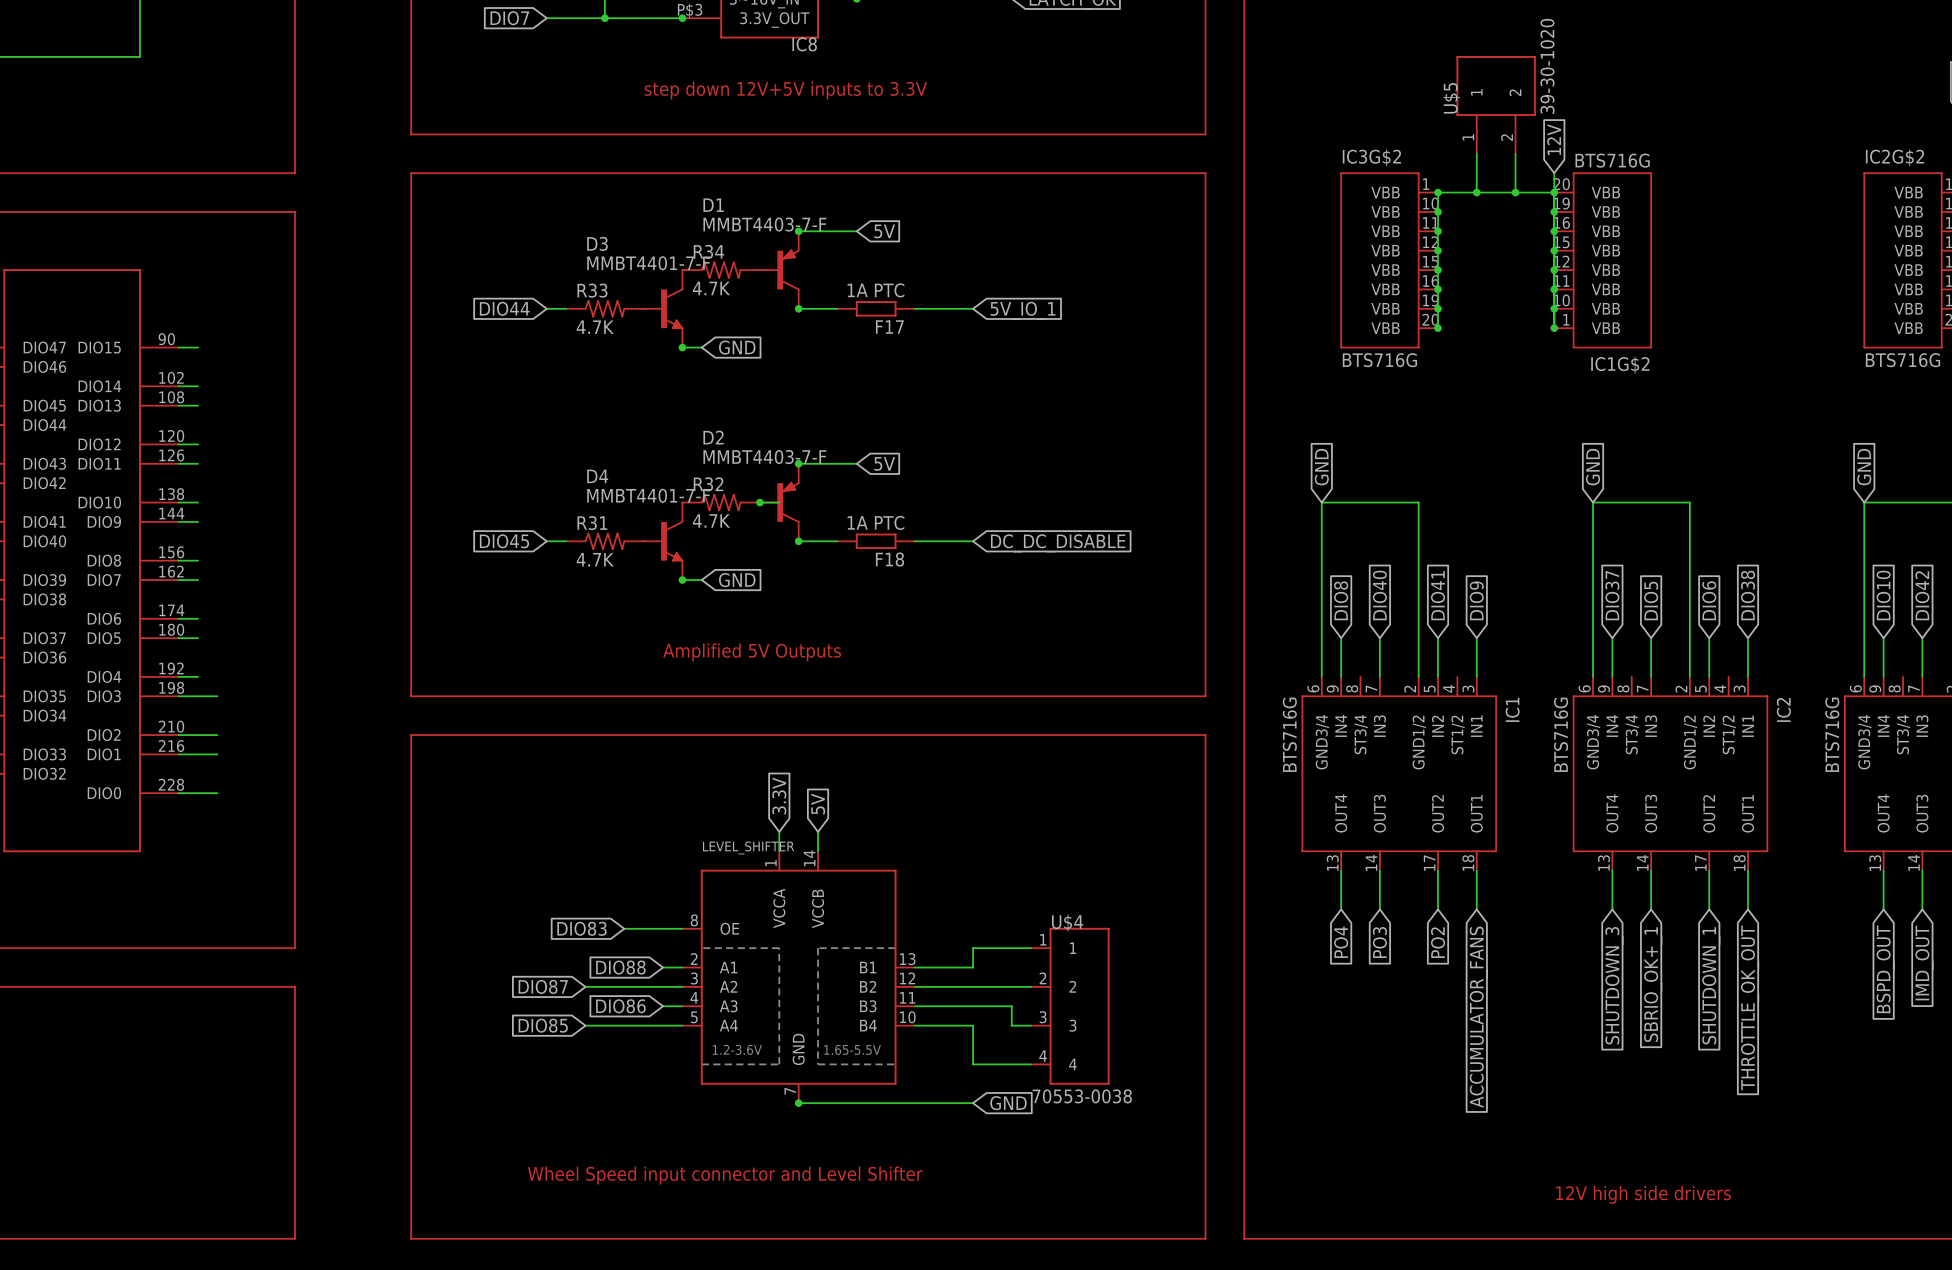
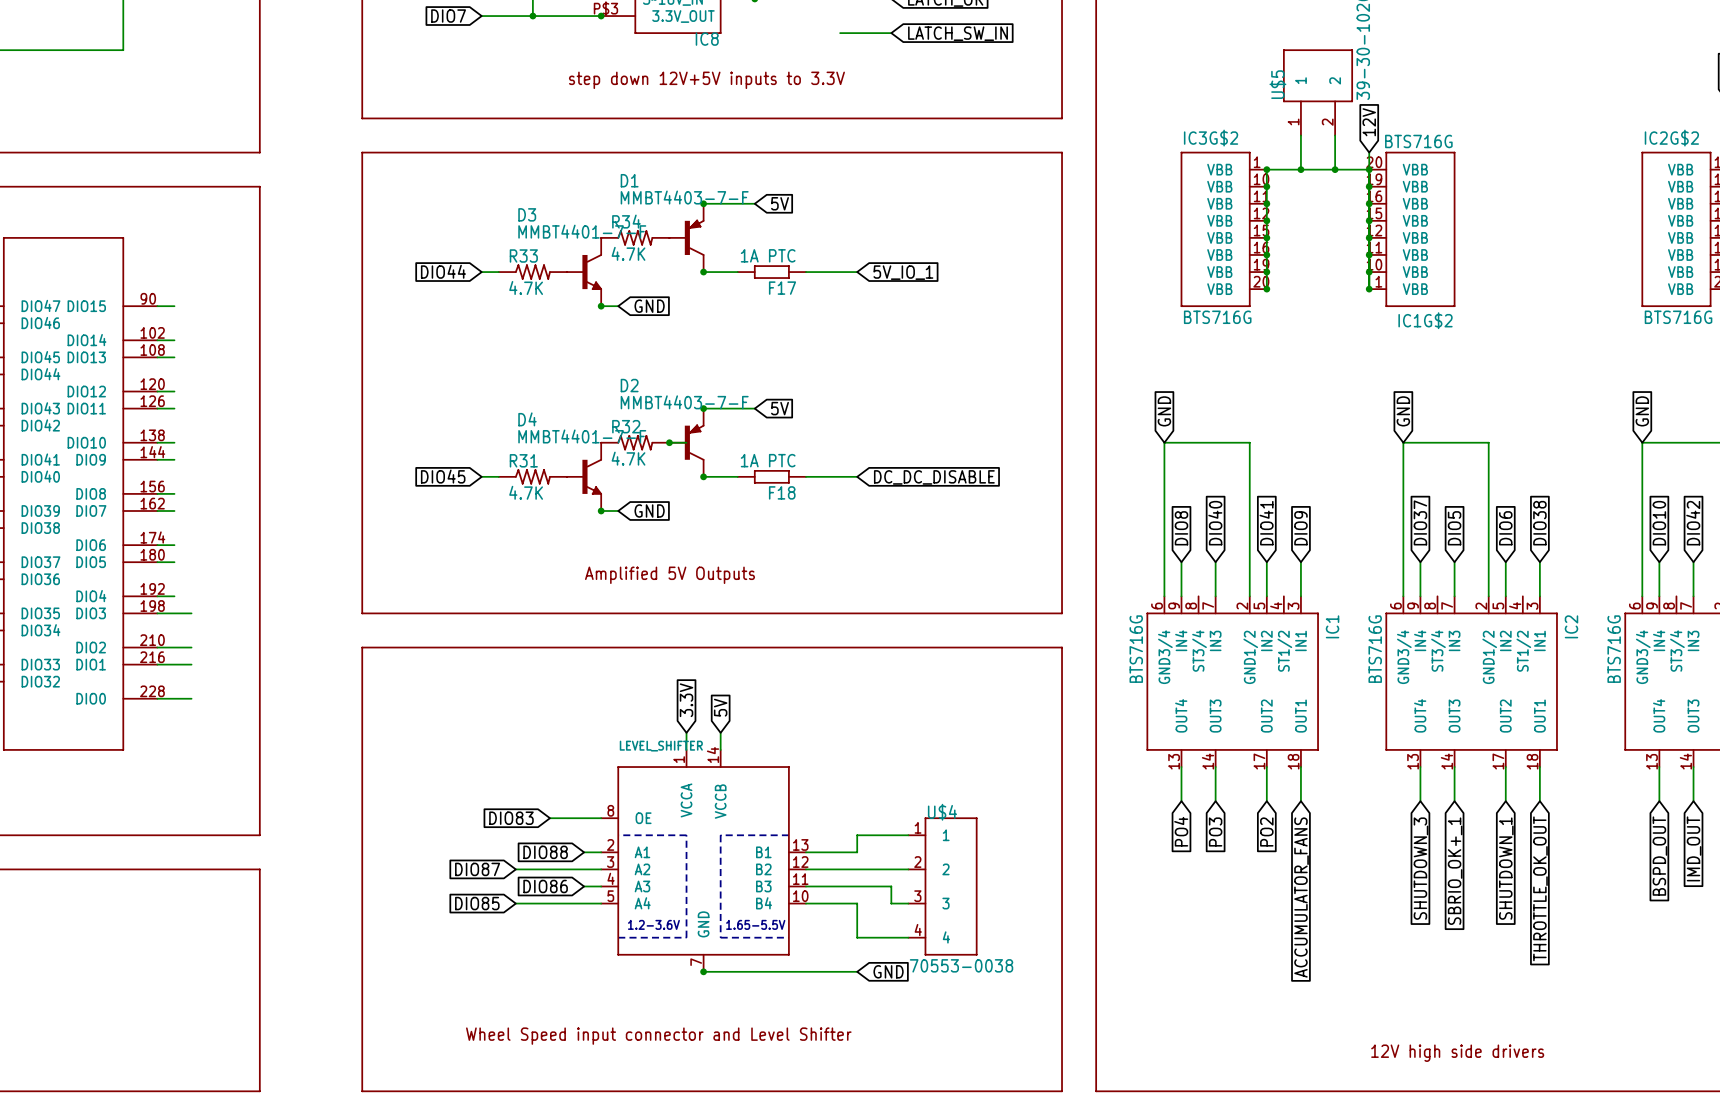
wire: none -> (840, 33) (891, 33)
global label: none -> LATCH_SW_IN (958, 33)

